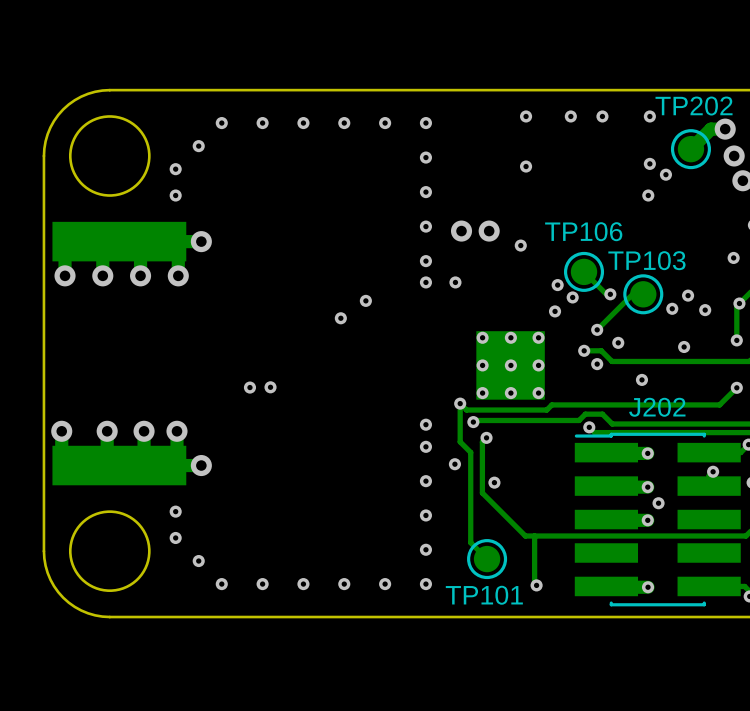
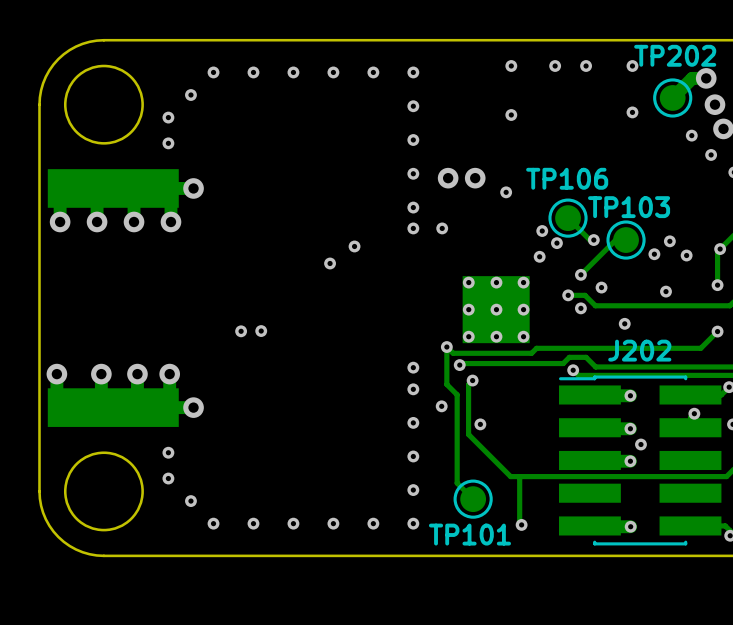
via: (665, 174) -> none
via: none -> (691, 135)
via: (648, 195) -> none
via: none -> (711, 154)
via: (733, 257) -> none

